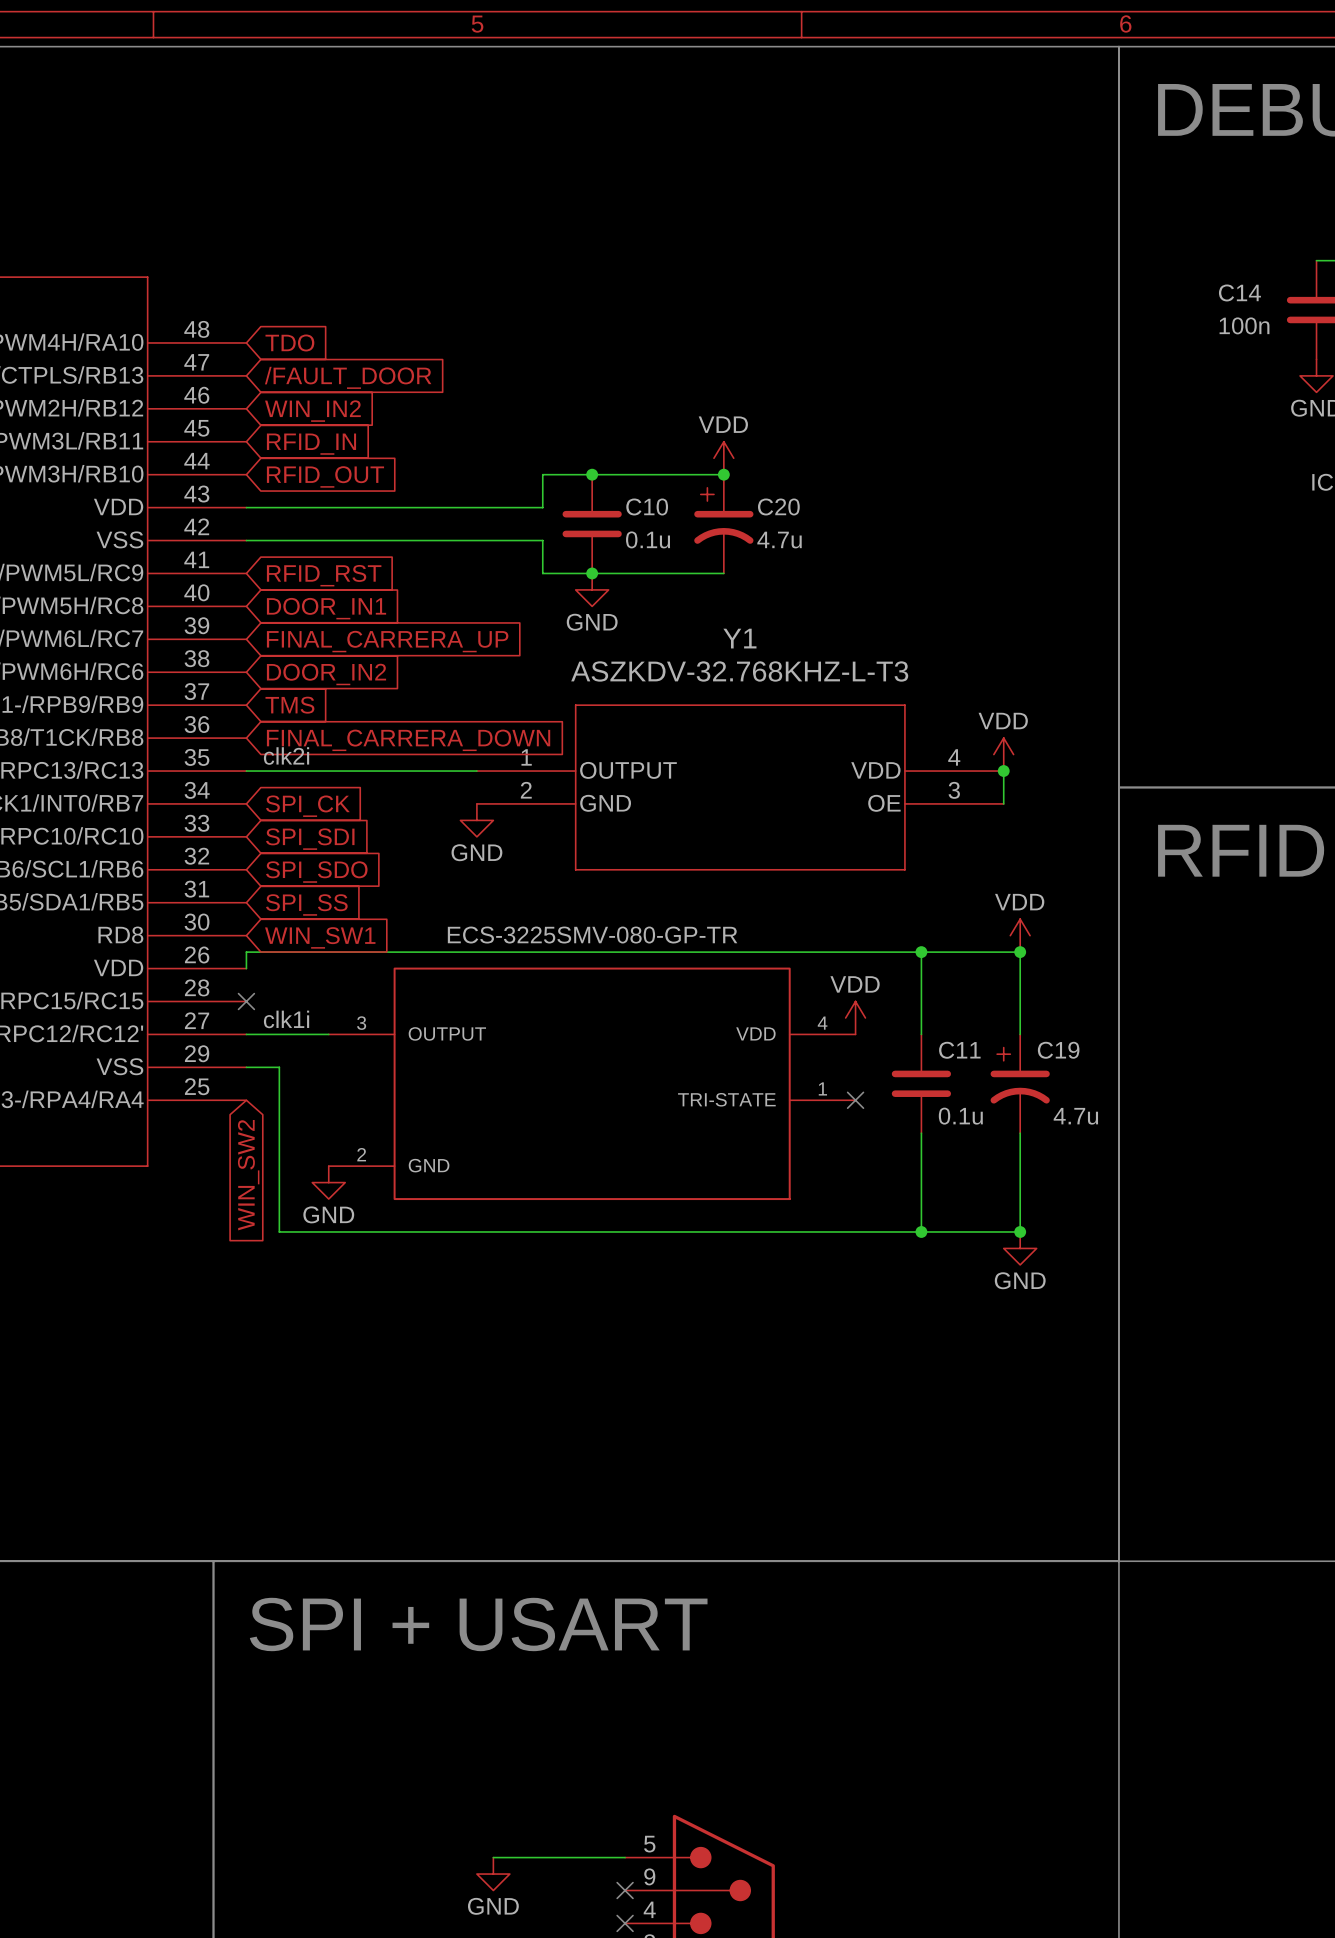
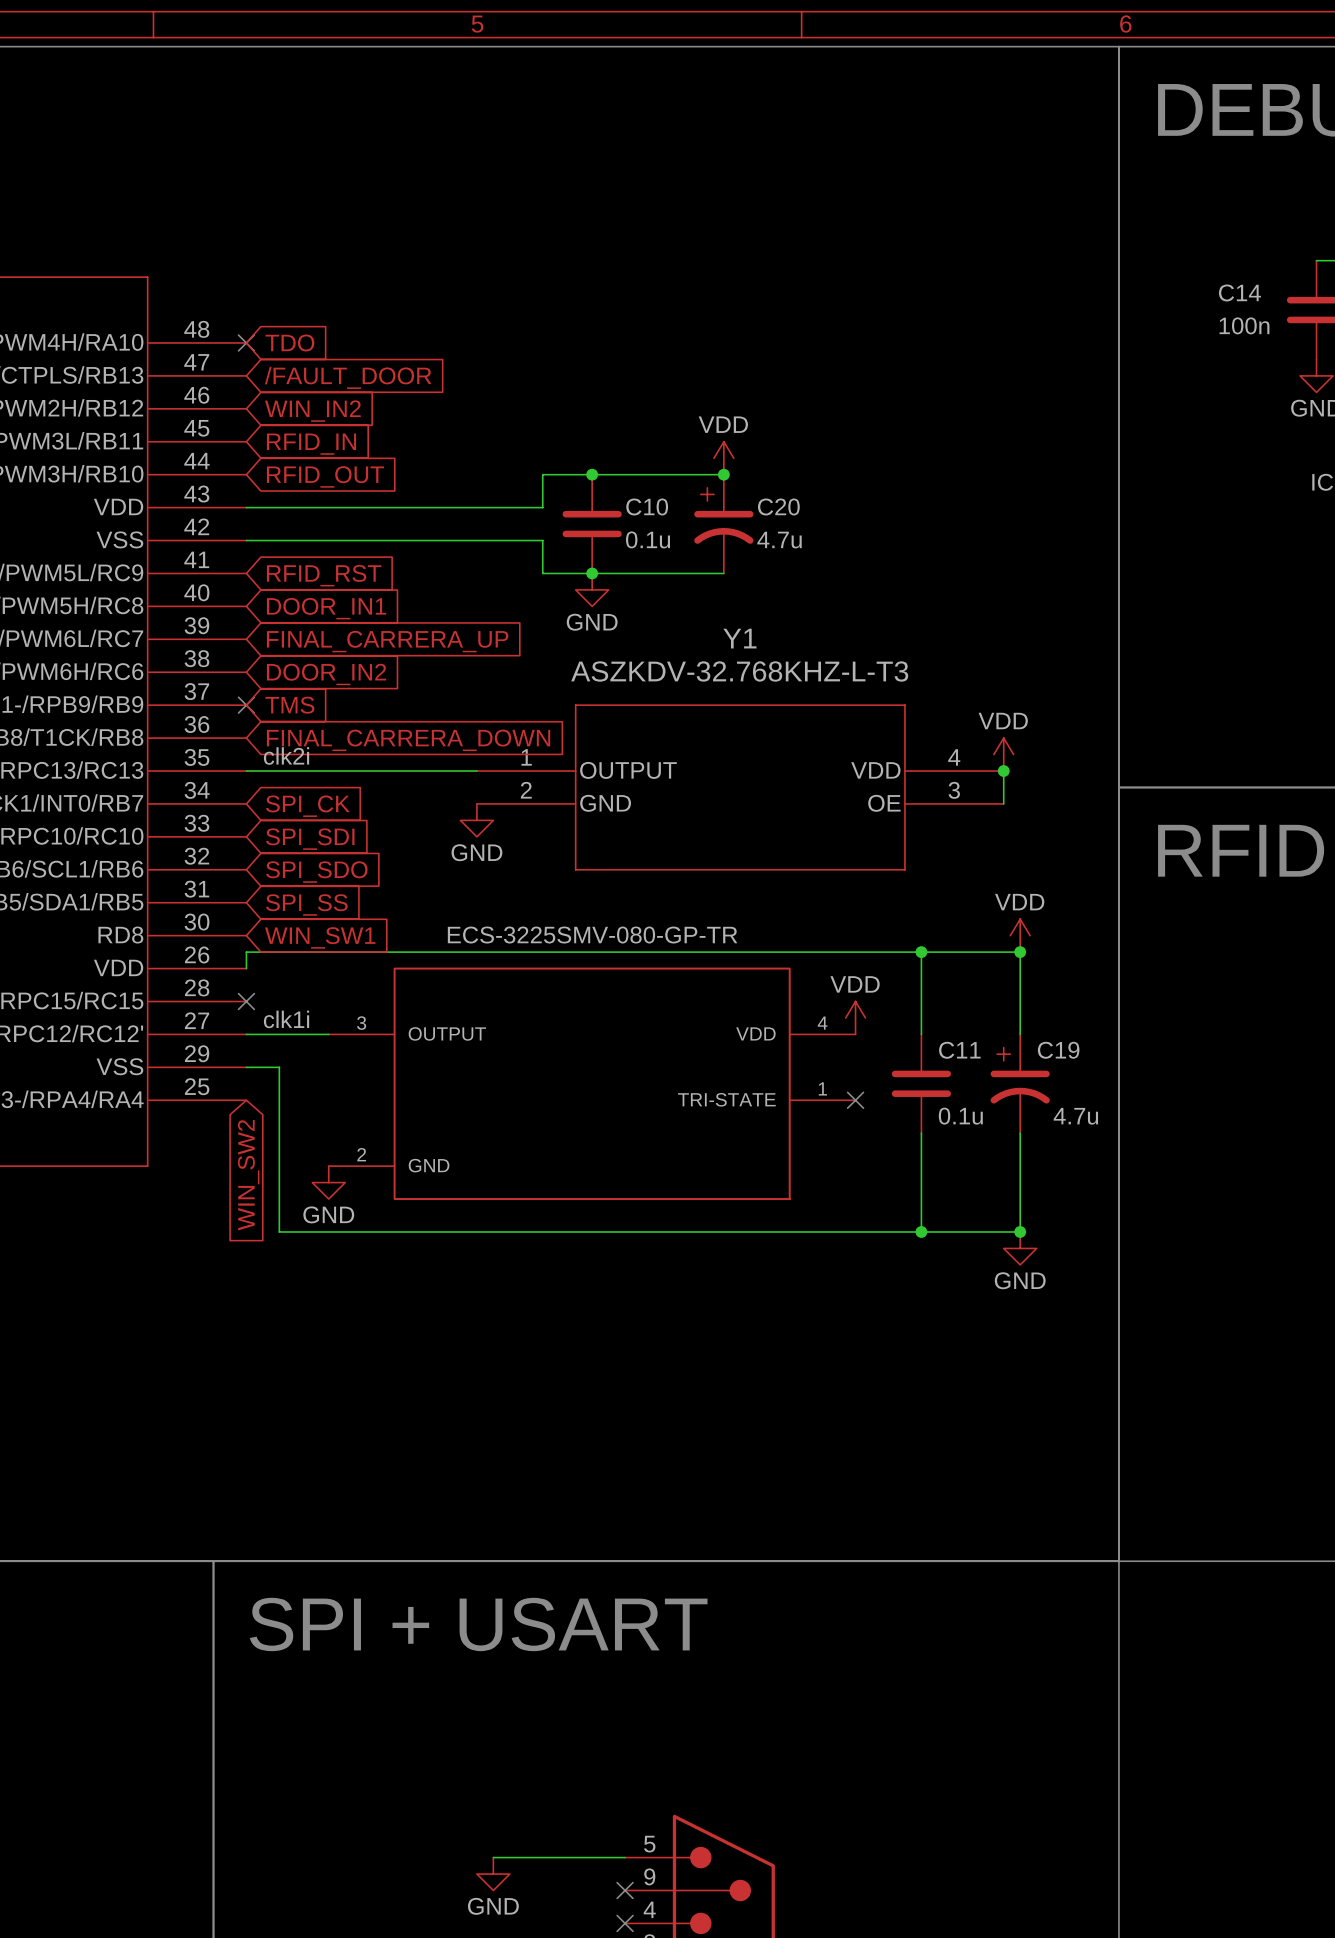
no-connect mark: none -> (246, 342)
no-connect mark: none -> (246, 705)

